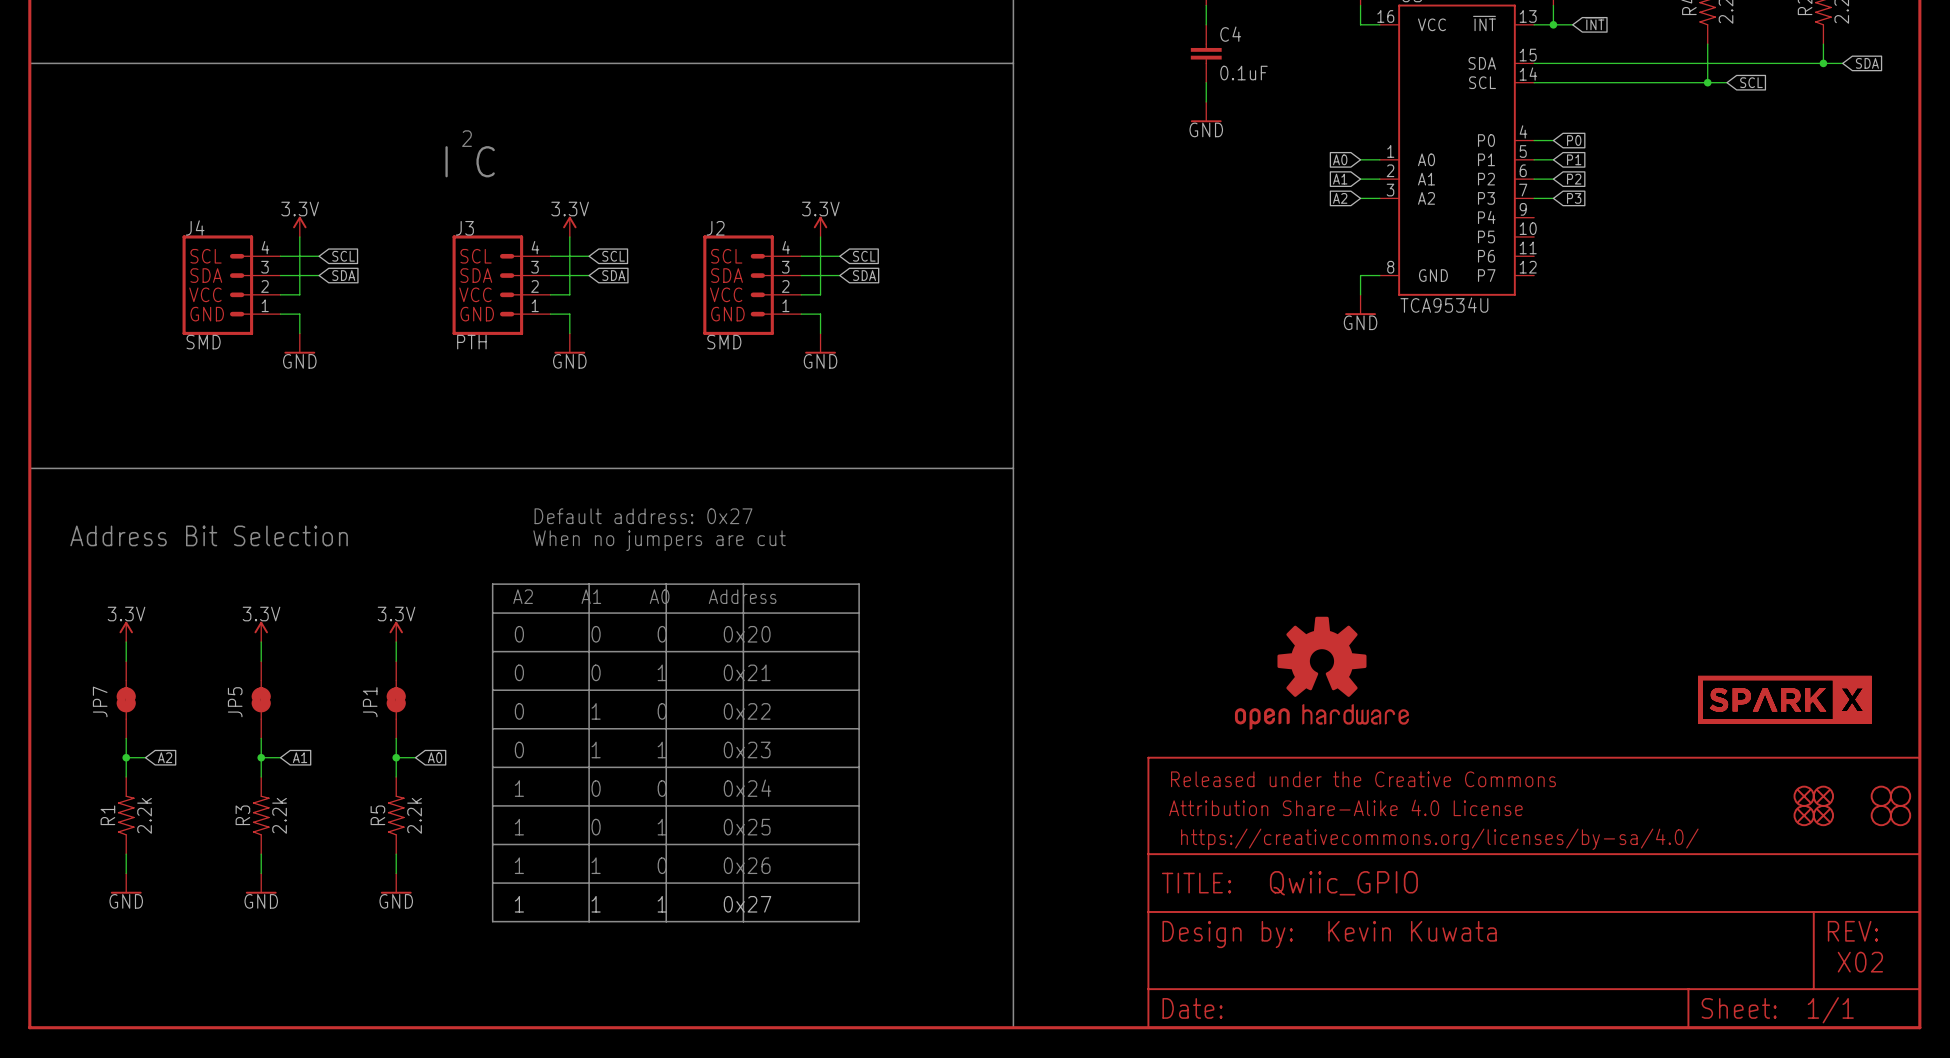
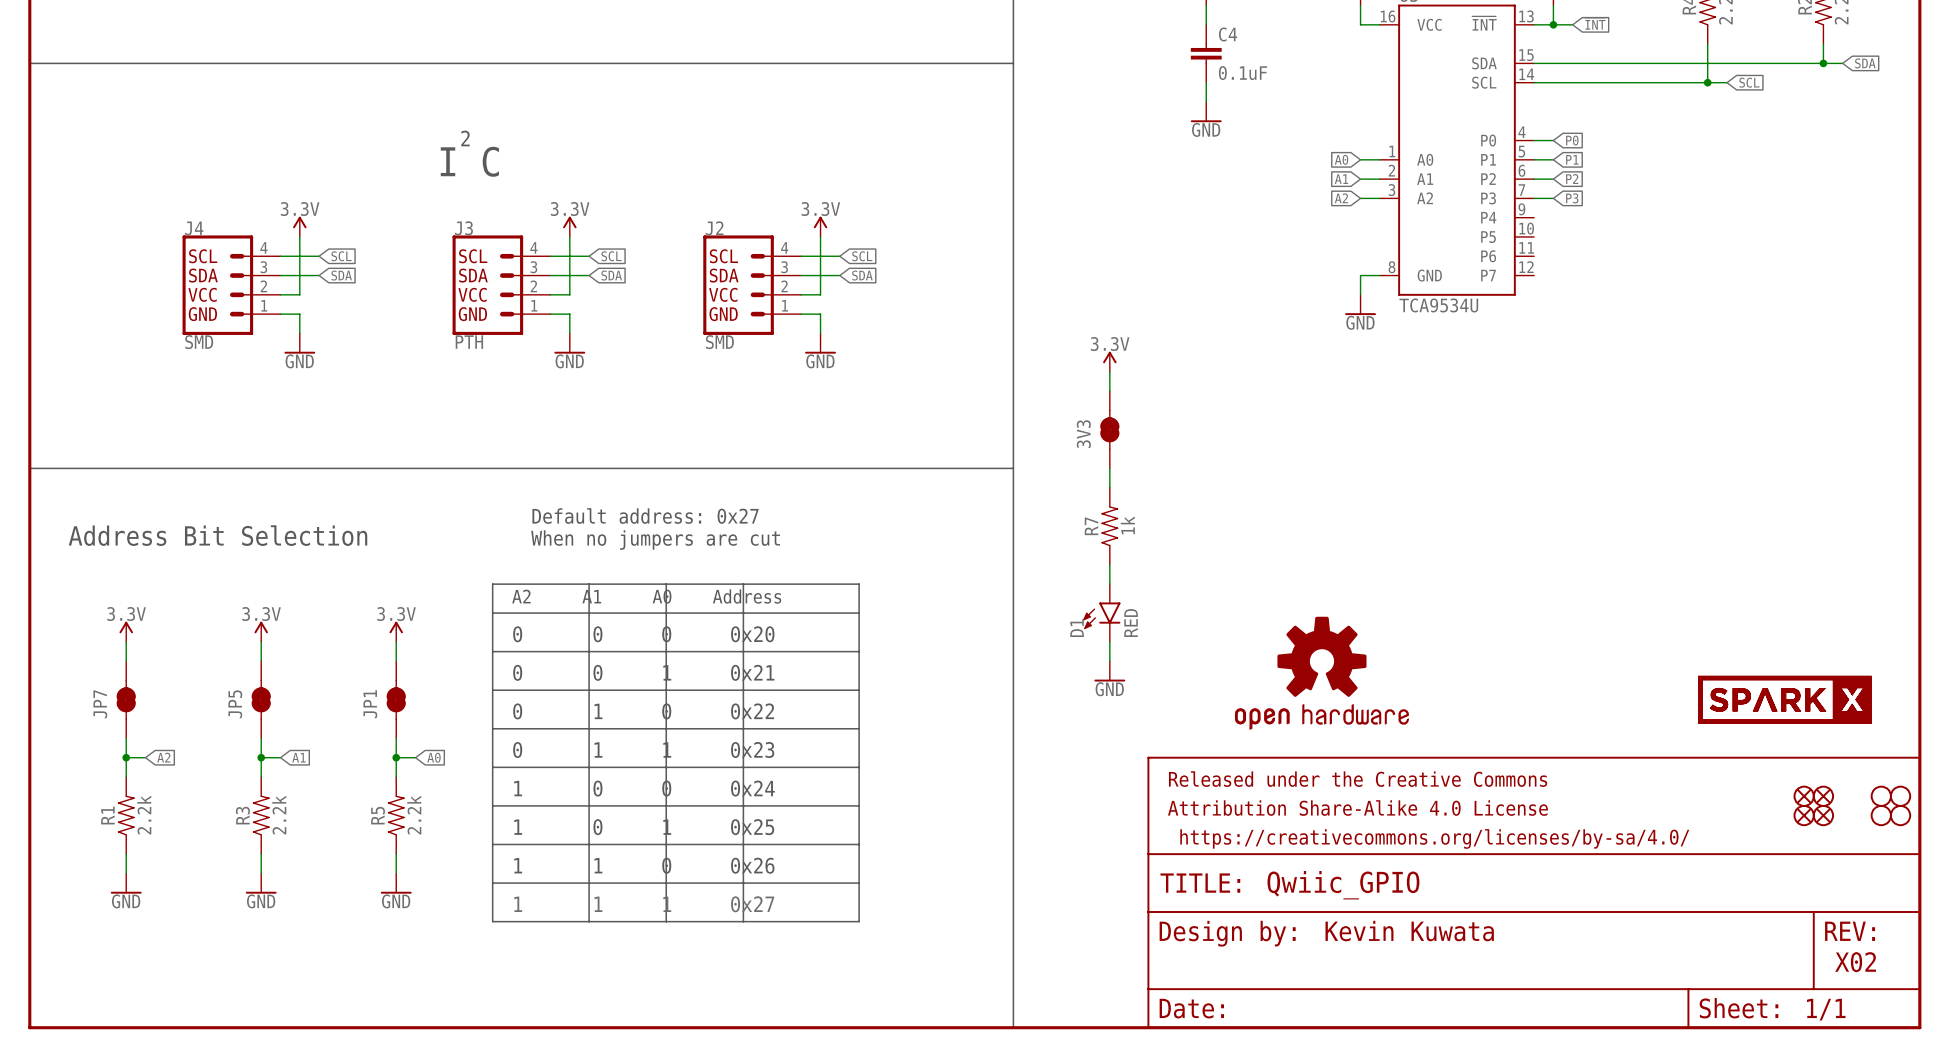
power symbol: none -> 3.3V (1109, 361)
wire: none -> (1109, 371) (1109, 391)
3V3: none -> (1109, 429)
wire: none -> (1109, 468) (1109, 487)
R7: none -> 1k (1109, 526)
wire: none -> (1109, 564) (1109, 584)
D1: none -> RED (1101, 613)
wire: none -> (1109, 641) (1109, 661)
power symbol: none -> GND (1109, 671)

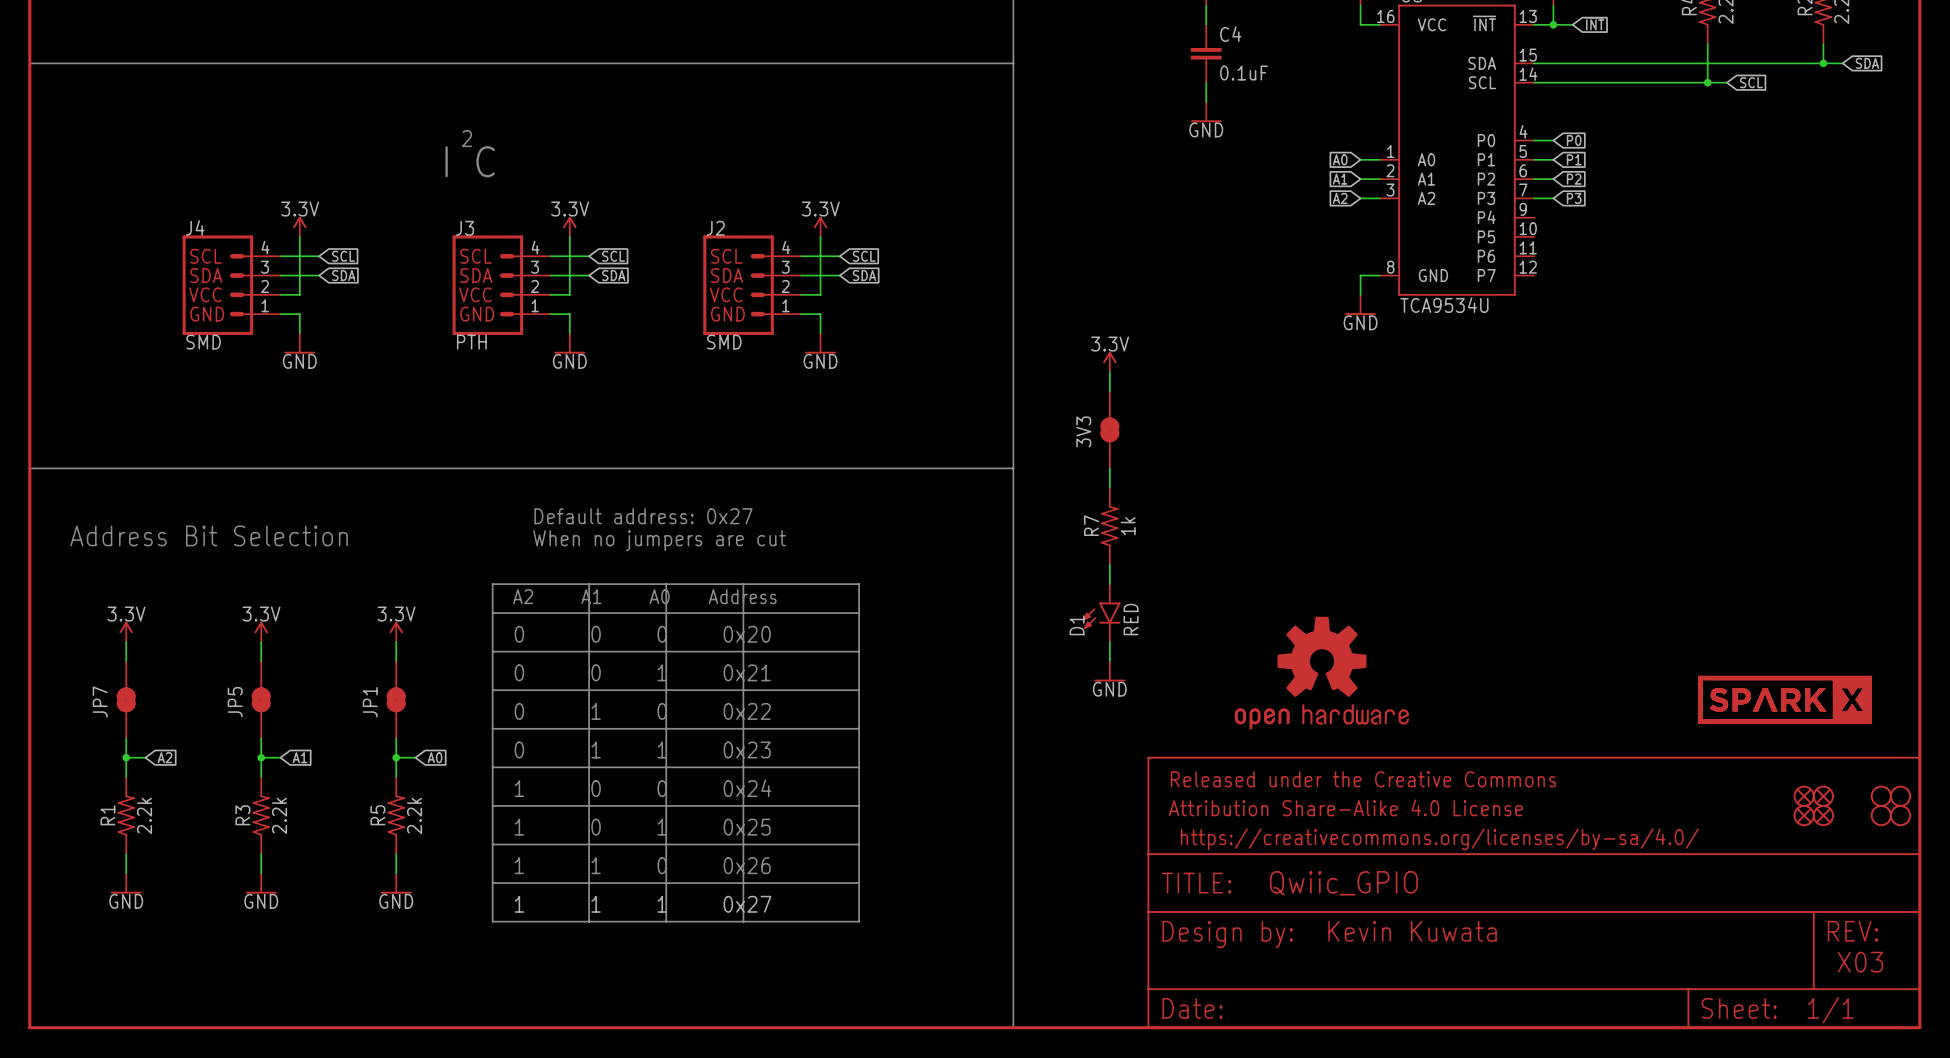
text: X02 (1855, 962) -> X03 (1860, 962)

